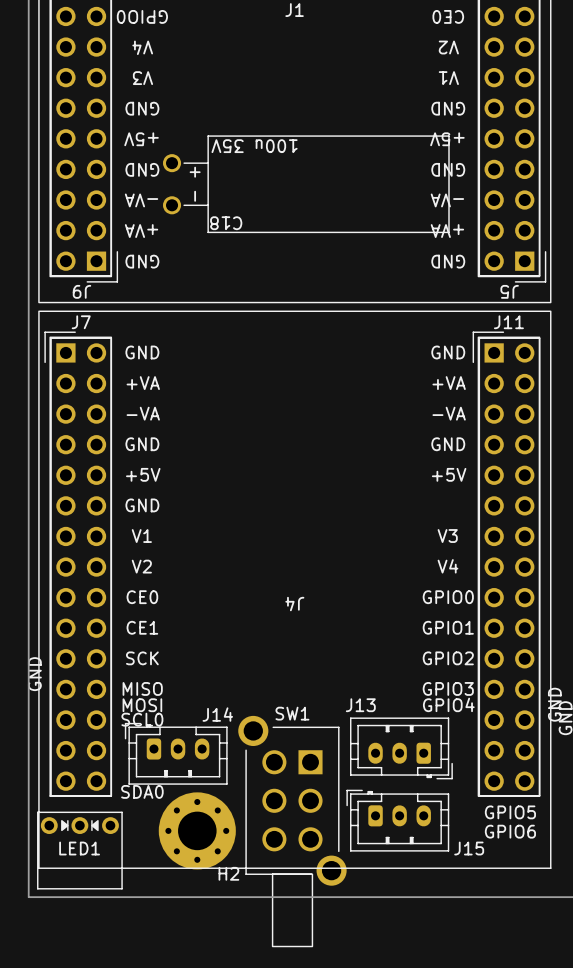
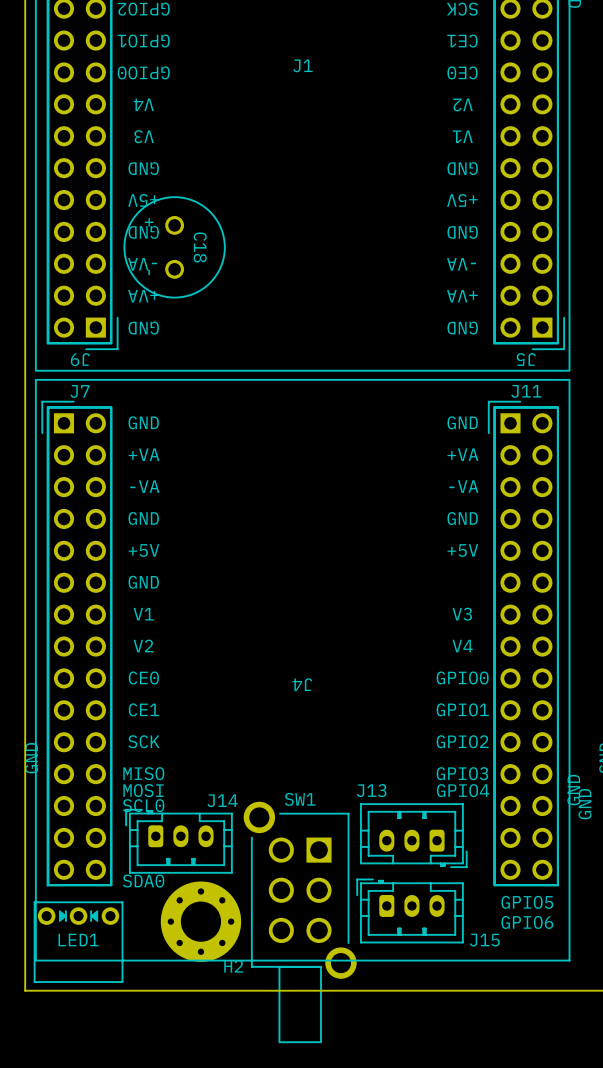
C18 footprint: [162, 135, 450, 234] -> [123, 196, 226, 299]
C18 value: 100u 35V (254, 146) -> none
C18 name position: C18 (226, 223) -> C18 (200, 247)

